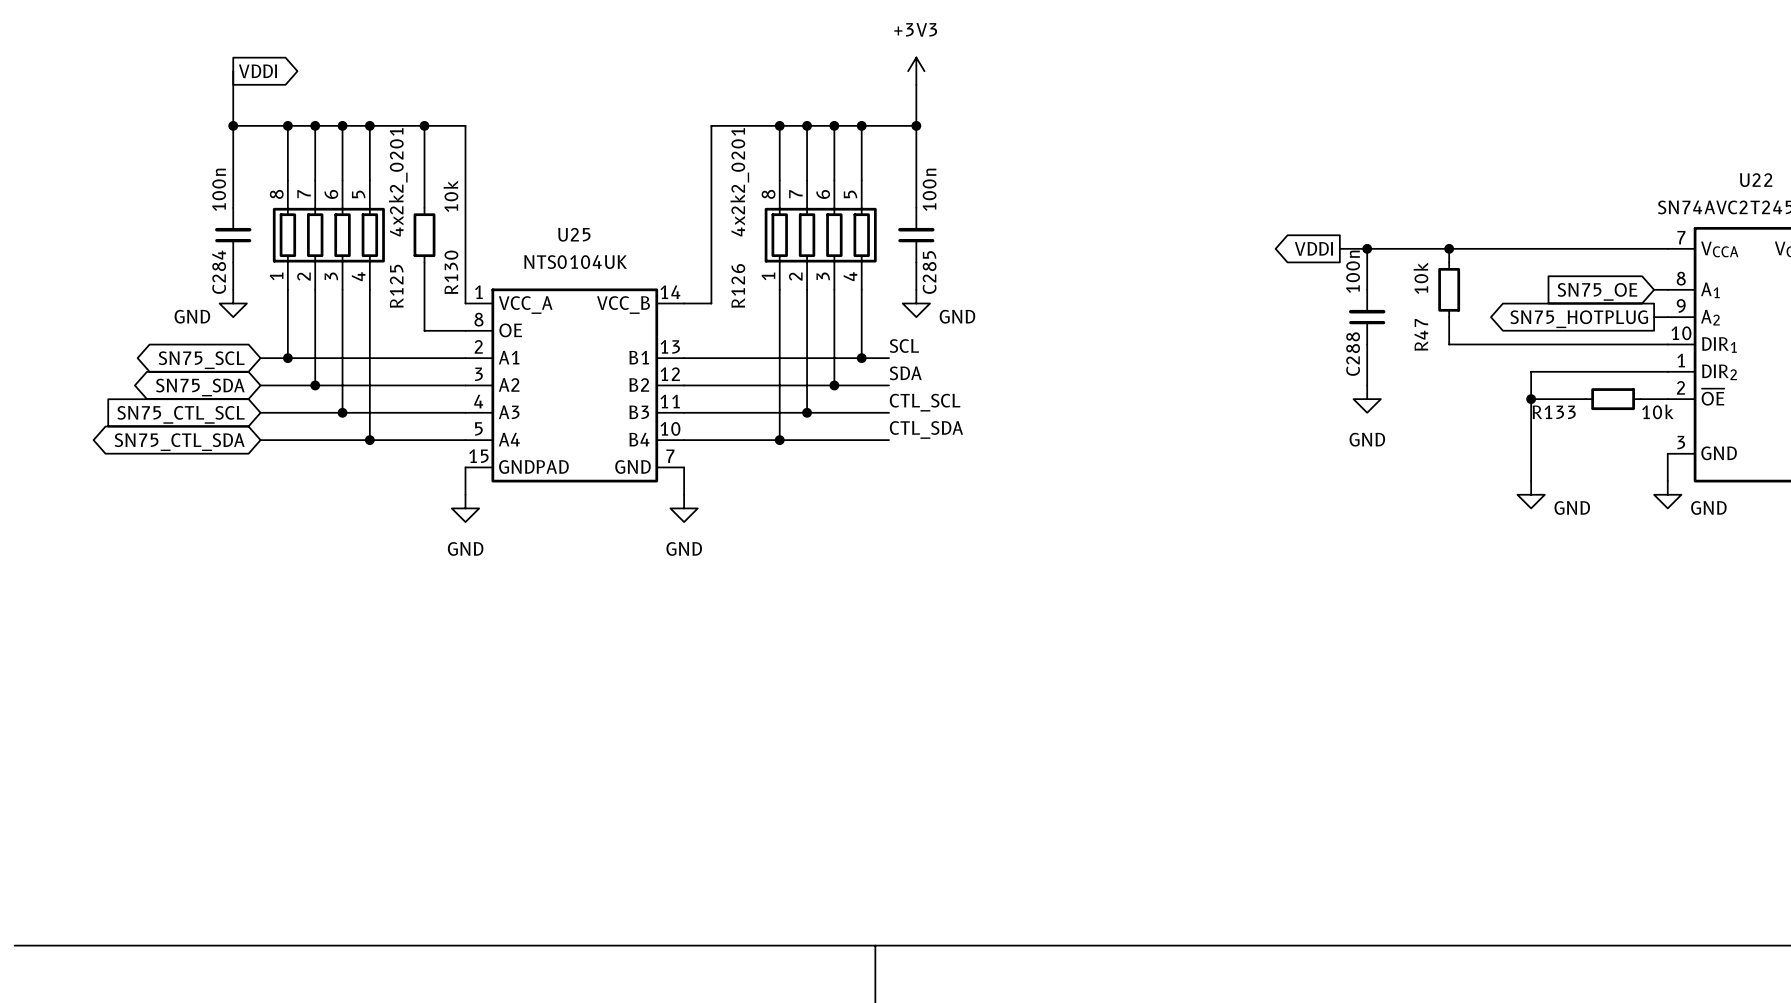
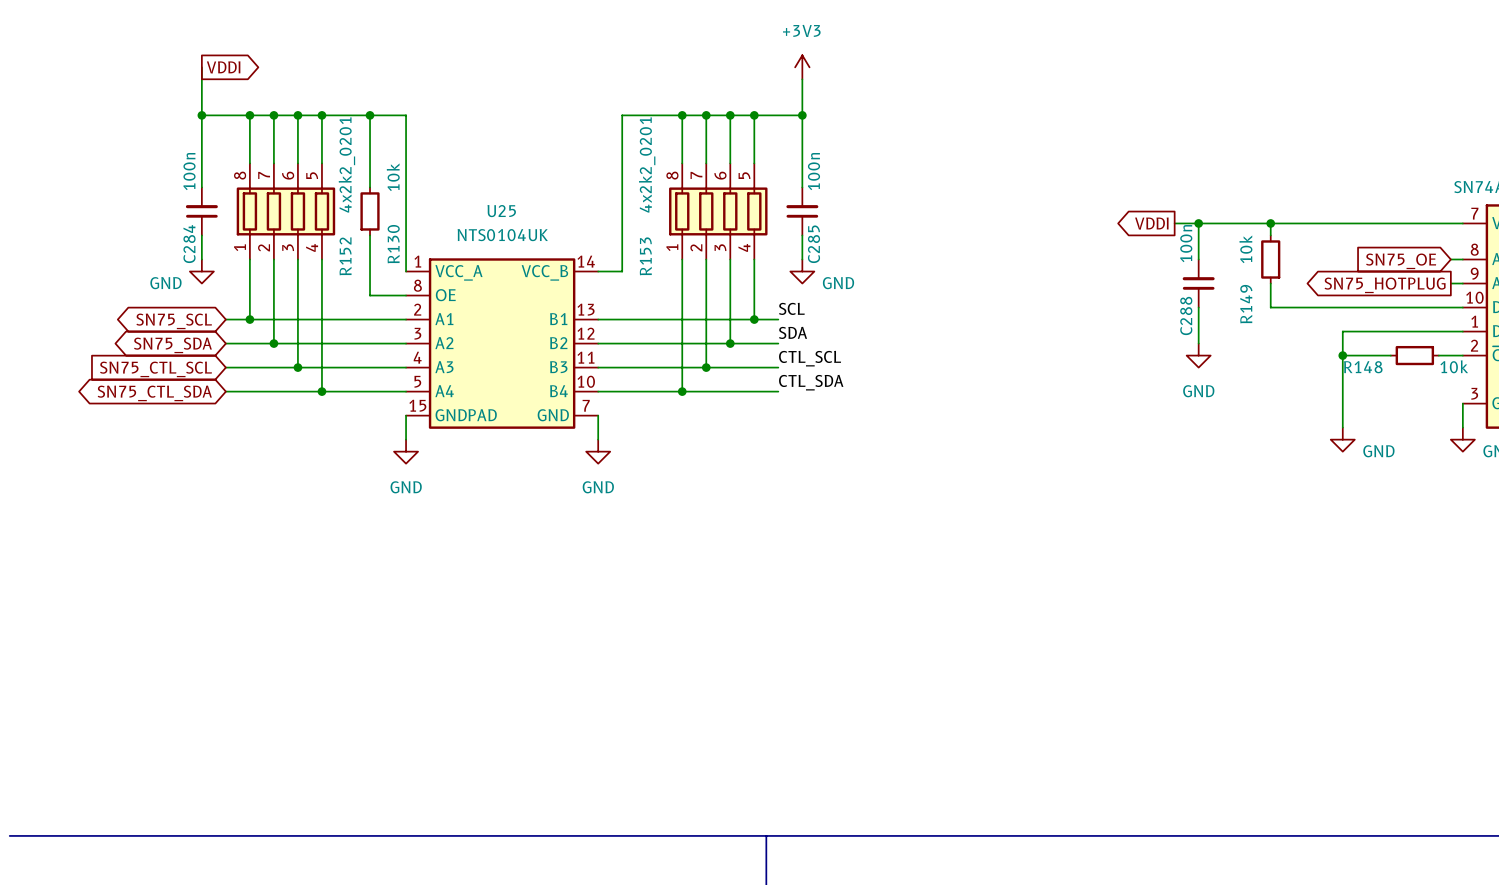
R126 name: R126 (738, 285) -> R153 (645, 256)
R125 name: R125 (396, 286) -> R152 (345, 256)
R47 name: R47 (1421, 334) -> R149 (1246, 304)
R133 name: R133 (1554, 412) -> R148 (1363, 367)

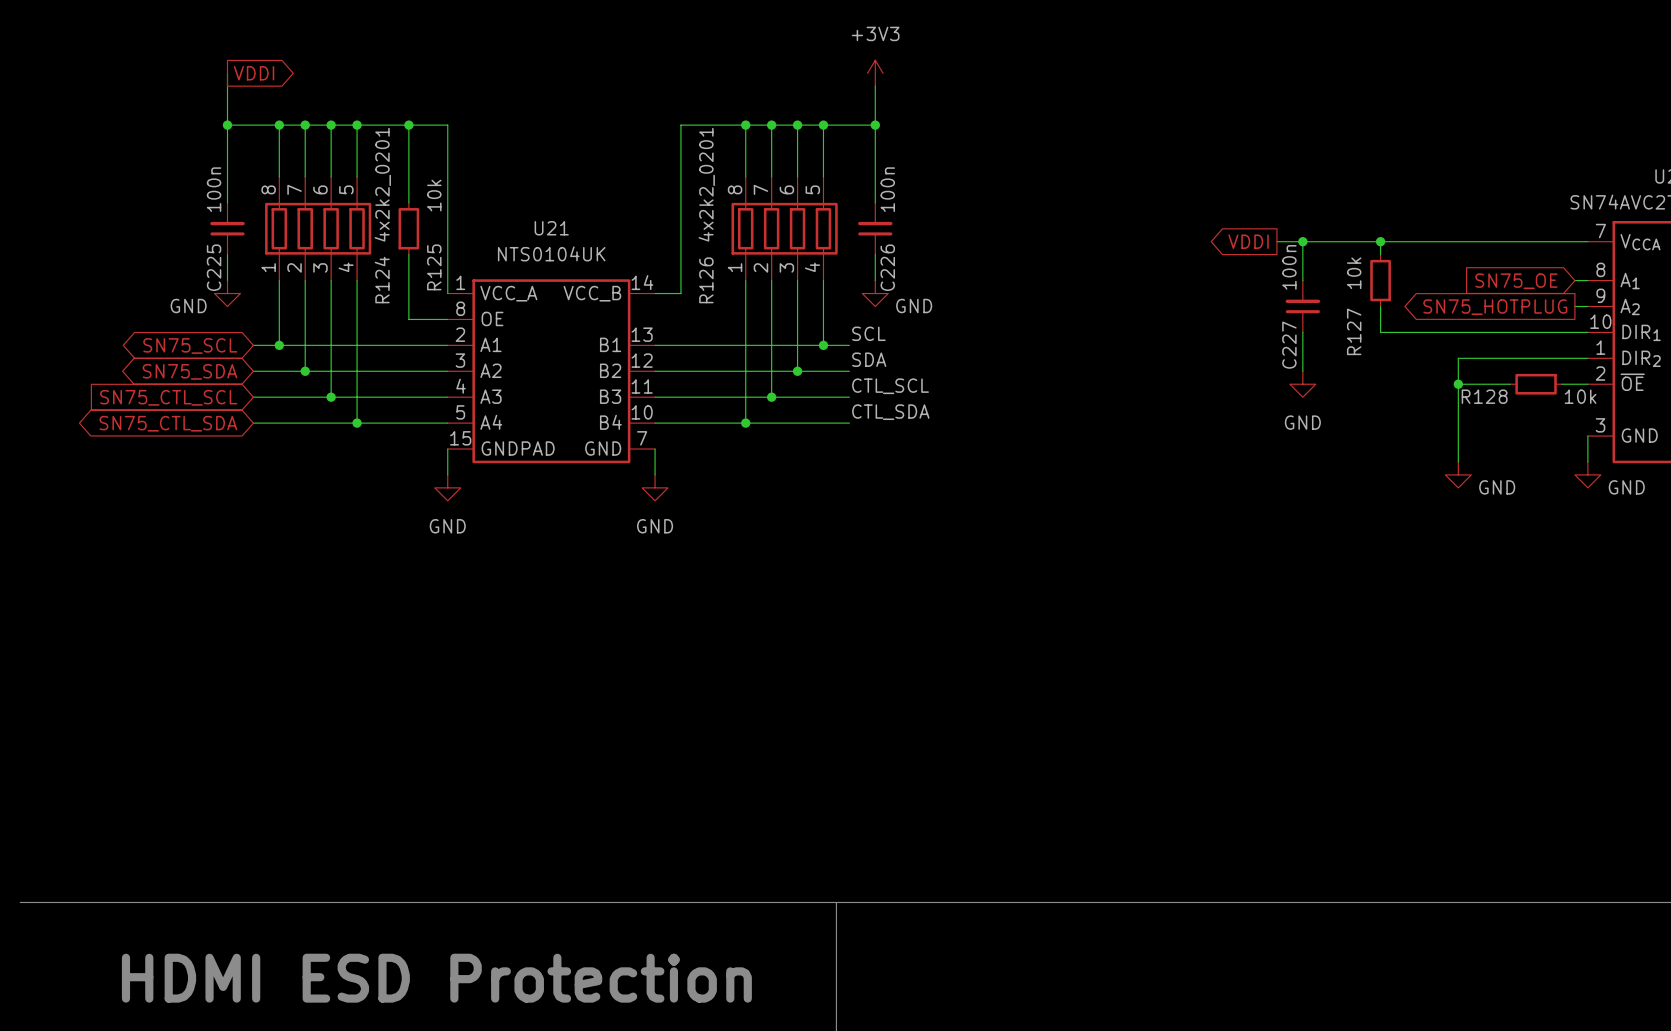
U25 name: U25 (501, 211) -> U21 (551, 228)
C284 name: C284 (189, 244) -> C225 (214, 267)
R130 name: R130 (393, 244) -> R125 (434, 267)
C285 name: C285 (813, 244) -> C226 (887, 267)
R152 name: R152 (345, 256) -> R124 (382, 280)
R153 name: R153 (645, 256) -> R126 (706, 280)
R149 name: R149 (1246, 304) -> R127 (1354, 331)
C288 name: C288 (1186, 315) -> C227 (1289, 345)
R148 name: R148 (1363, 367) -> R128 (1484, 396)

